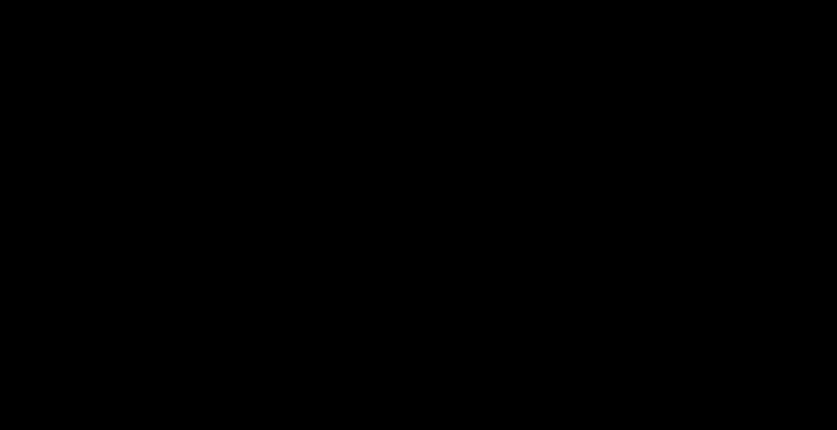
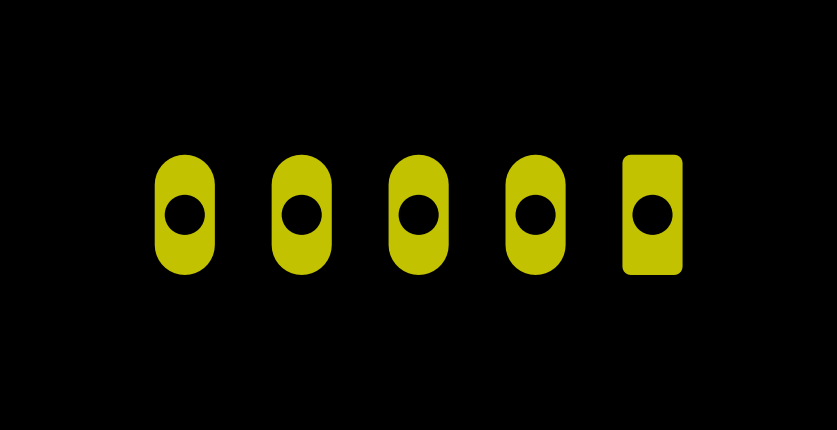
part: none -> (418, 214)

